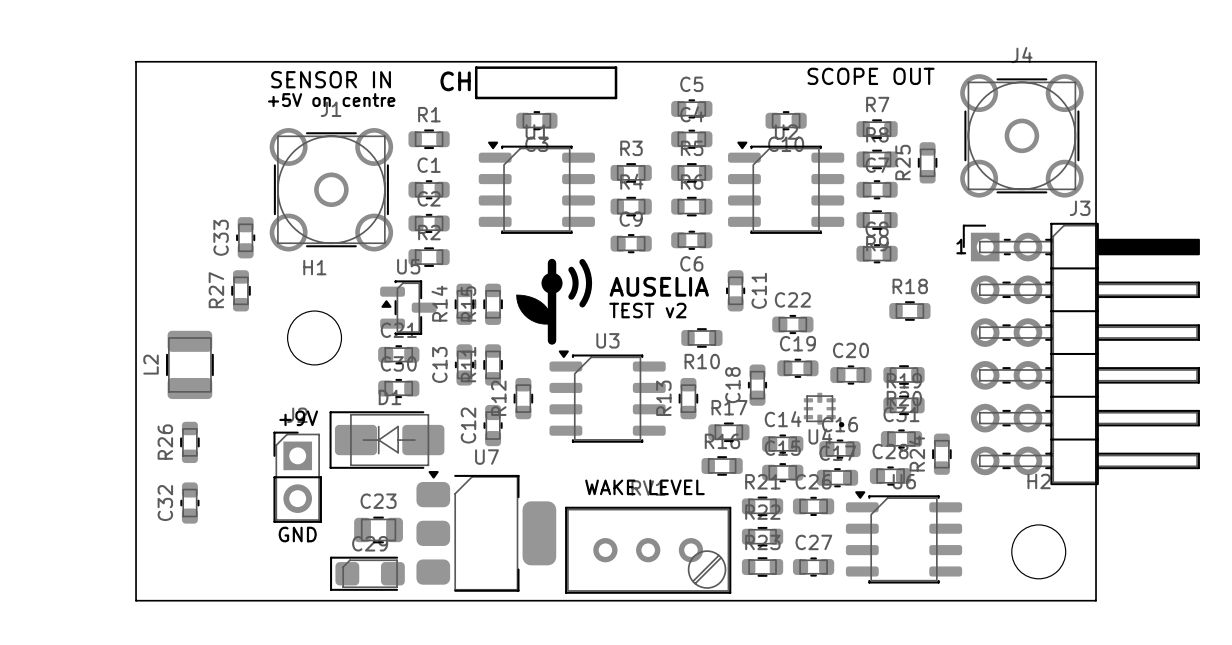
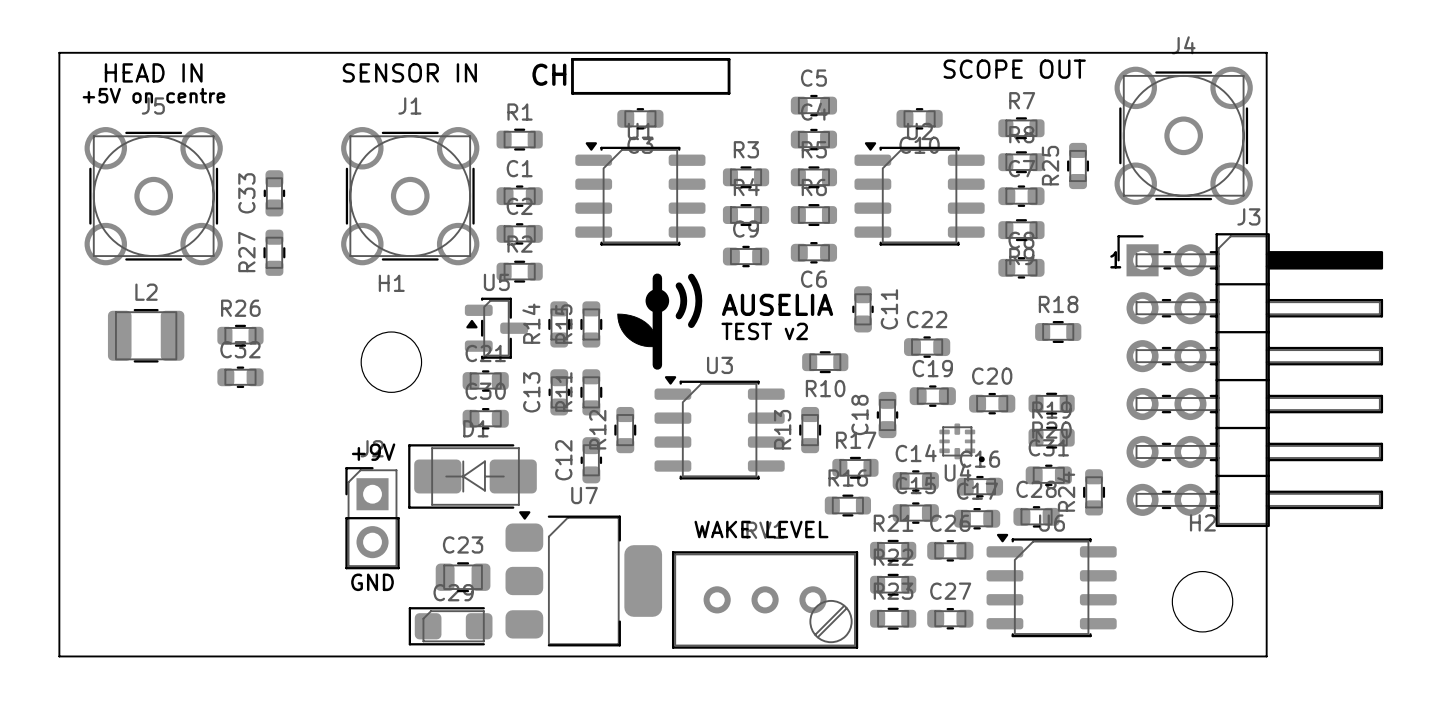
board edge: (136, 61) (136, 600) -> (191, 52) (59, 52) (59, 656) (191, 656)
text: none -> HEAD IN (153, 72)
text position: +5V on centre (331, 100) -> +5V on centre (154, 95)
J5: none -> (153, 196)
C33 position: (245, 237) -> (274, 193)
R27 position: (240, 290) -> (274, 252)
L2 rotation: 0° (189, 364) -> 90° clockwise (146, 335)
L2 position: (189, 364) -> (146, 335)
R26 rotation: 0° (189, 442) -> 90° clockwise (240, 335)
R26 position: (189, 442) -> (240, 335)
C32 rotation: 0° (189, 503) -> 90° clockwise (240, 377)
C32 position: (189, 503) -> (240, 377)

